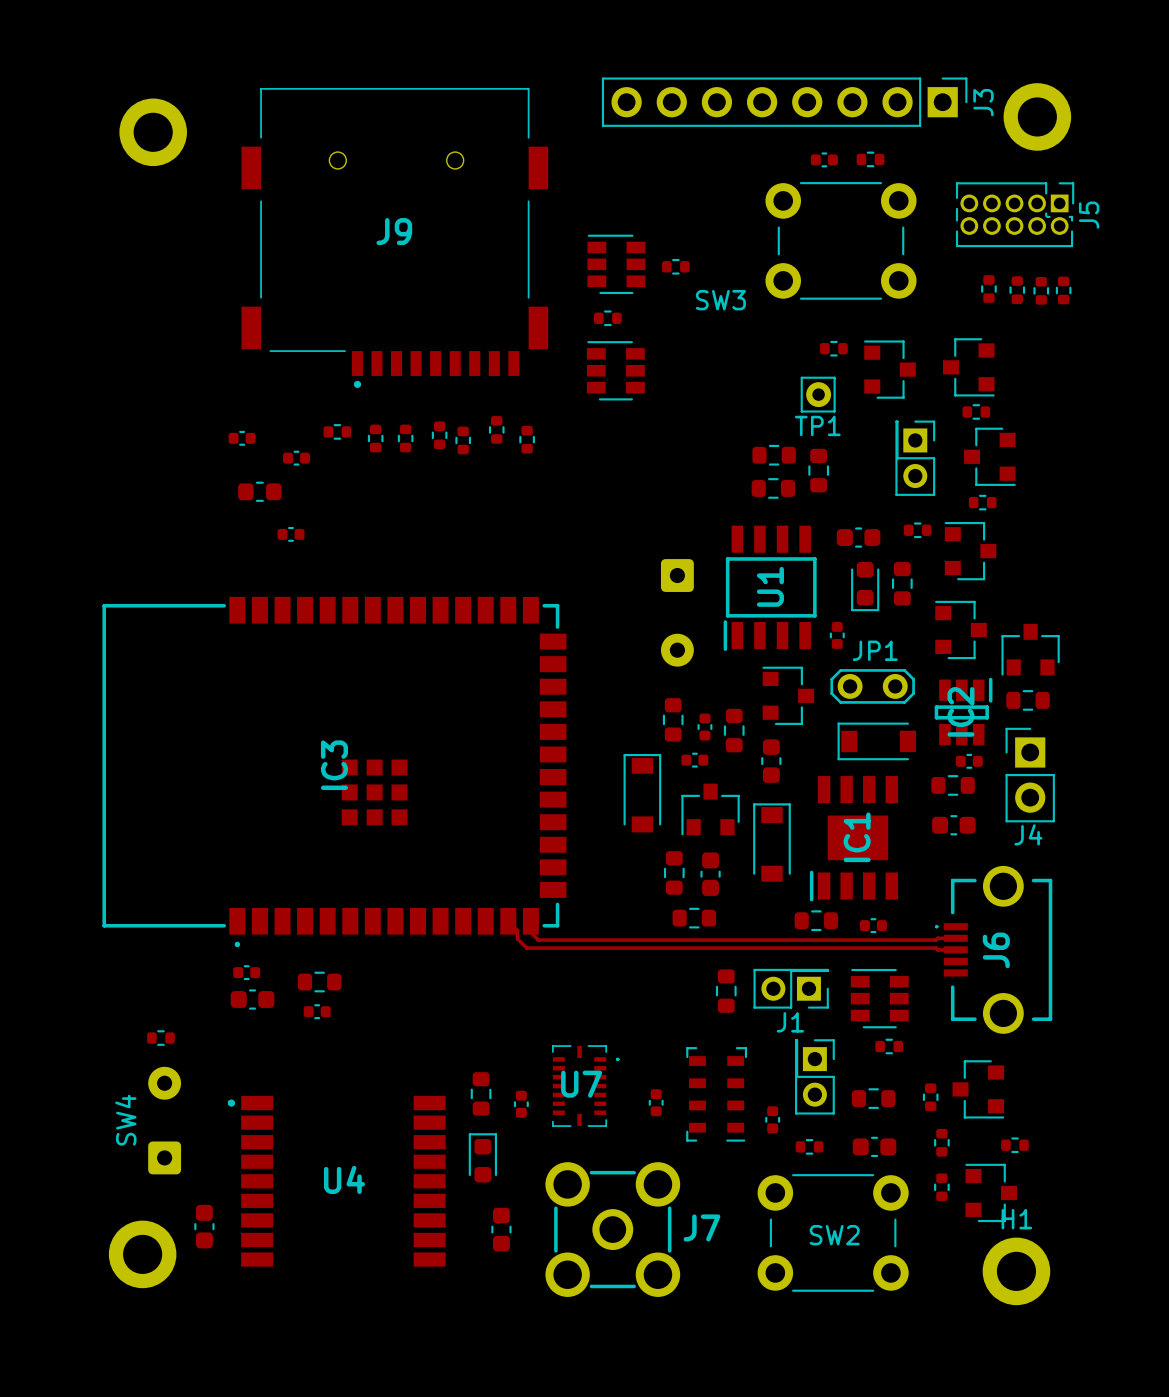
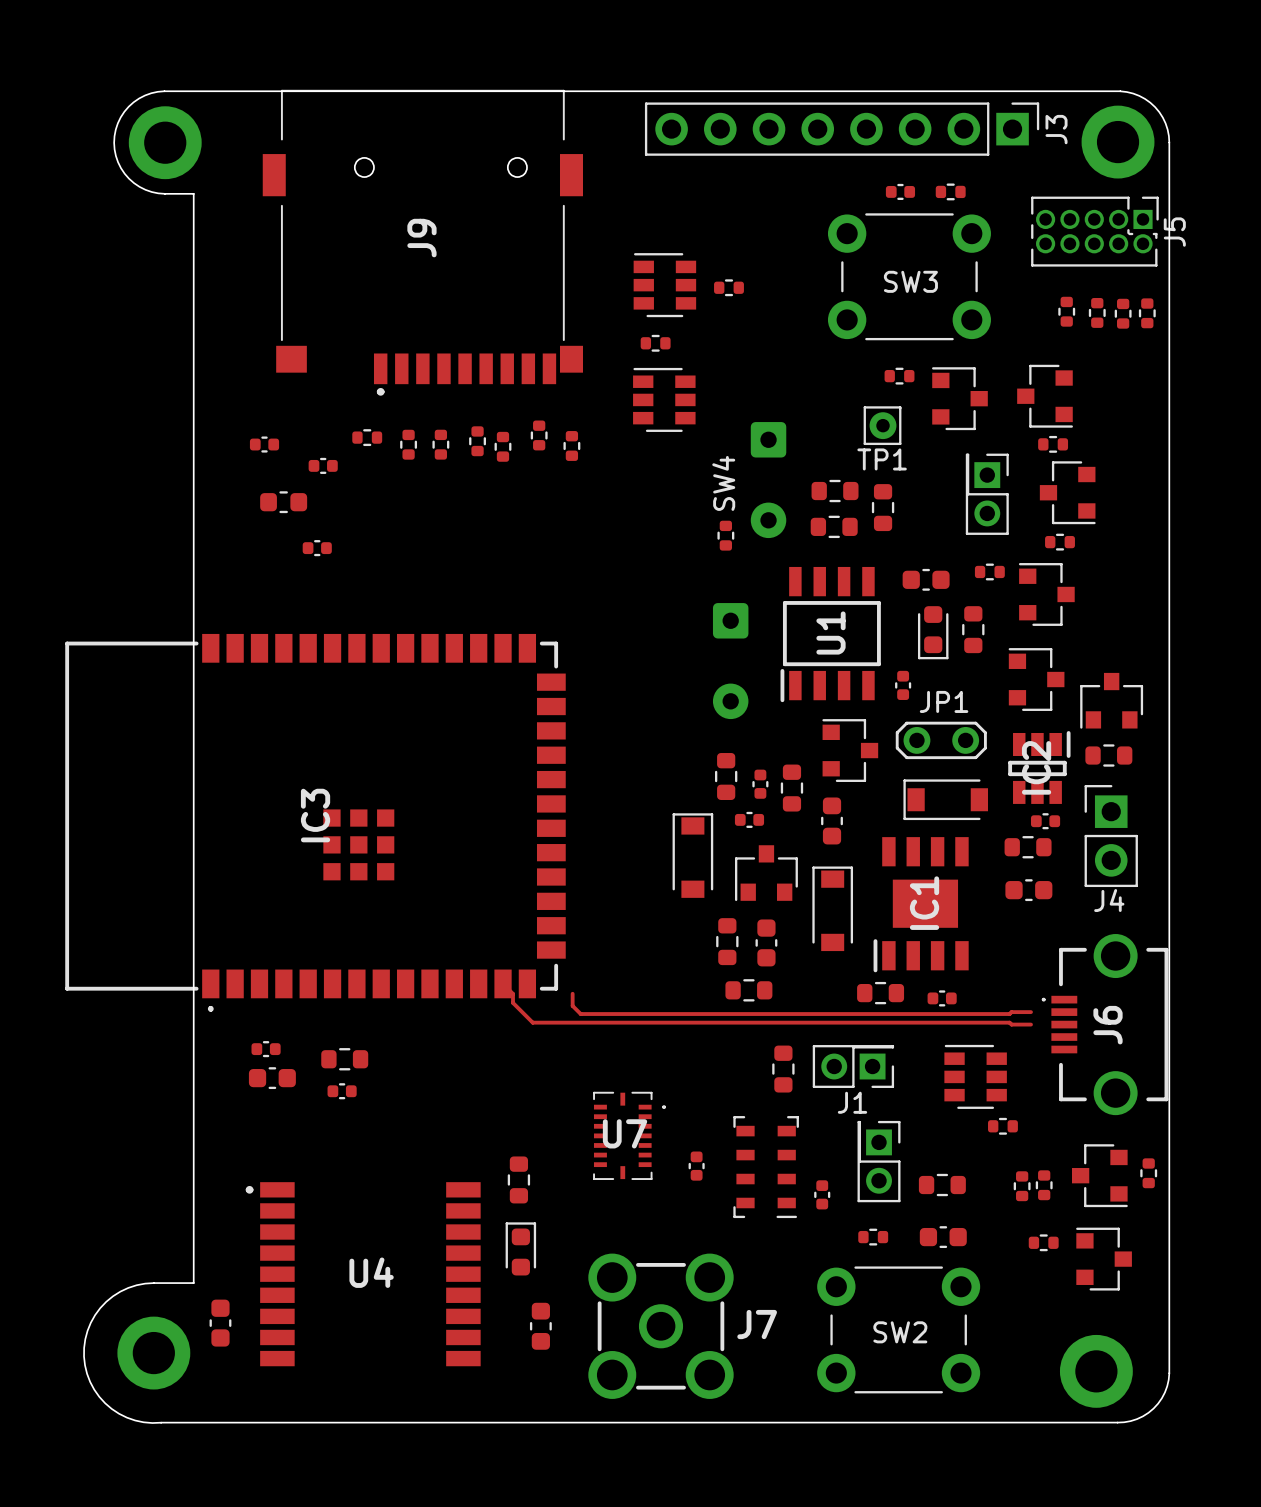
board edge: none -> (164, 91) (1120, 91)
board edge: none -> (164, 91) (145, 95) (128, 106) (117, 123) (114, 142) (115, 155) (121, 168) (129, 178) (139, 186) (158, 193) (193, 193) (193, 1283) (145, 1283) (128, 1287) (113, 1296) (100, 1308) (90, 1322) (85, 1339) (84, 1356) (90, 1381) (105, 1403) (126, 1417) (143, 1422) (161, 1422)
board edge: none -> (1120, 91) (1139, 95) (1155, 107) (1165, 123) (1169, 142) (1169, 1373) (1167, 1386) (1158, 1403) (1148, 1412) (1136, 1419) (1117, 1422) (161, 1422)
J9 footprint: [241, 87, 549, 388] -> [262, 89, 584, 396]
J3 position: (784, 102) -> (842, 129)
part position: (1037, 116) -> (1118, 142)
part position: (824, 159) -> (900, 191)
part position: (870, 159) -> (950, 191)
SW3 position: (841, 240) -> (909, 276)
SW3 name position: SW3 (720, 300) -> SW3 (910, 281)
part: none -> (539, 435)
part: none -> (367, 437)
part: none -> (477, 441)
part: none -> (408, 444)
part: none -> (440, 444)
part: none -> (571, 445)
part: none -> (502, 446)
part: (496, 429) -> none
part: none -> (323, 465)
part: (337, 431) -> none
part: (439, 435) -> none
part position: (242, 438) -> (264, 444)
part: (375, 438) -> none
part: (405, 438) -> none
part: (527, 439) -> none
part: (463, 440) -> none
part: (296, 458) -> none
part position: (259, 491) -> (283, 502)
part: none -> (725, 535)
part: none -> (317, 548)
part: (291, 534) -> none
IC3 position: (334, 771) -> (315, 822)
top track: (508, 921) (517, 930) (517, 938) (526, 948) -> (503, 983) (513, 993) (513, 1002) (532, 1022) (568, 1022)
J6 position: (993, 949) -> (1105, 1024)
part position: (879, 998) -> (975, 1076)
part: (160, 1038) -> none
part: none -> (1002, 1126)
part: (889, 1046) -> none
part footprint: [952, 1060, 1005, 1119] -> [1035, 1170, 1053, 1201]
U7 position: (585, 1086) -> (629, 1135)
part: none -> (1148, 1173)
part: none -> (1099, 1175)
part position: (716, 1094) -> (766, 1167)
part position: (930, 1097) -> (1022, 1186)
part position: (656, 1102) -> (696, 1166)
part: (521, 1104) -> none
part position: (772, 1119) -> (822, 1194)
SW4 rotation: 0° (164, 1120) -> 180° (768, 480)
SW4 position: (164, 1120) -> (768, 480)
part: (941, 1142) -> none
part: (1015, 1145) -> none
part: none -> (1043, 1242)
part: (941, 1187) -> none
part position: (991, 1192) -> (1104, 1259)
H1 name: H1 (1016, 1219) -> none

